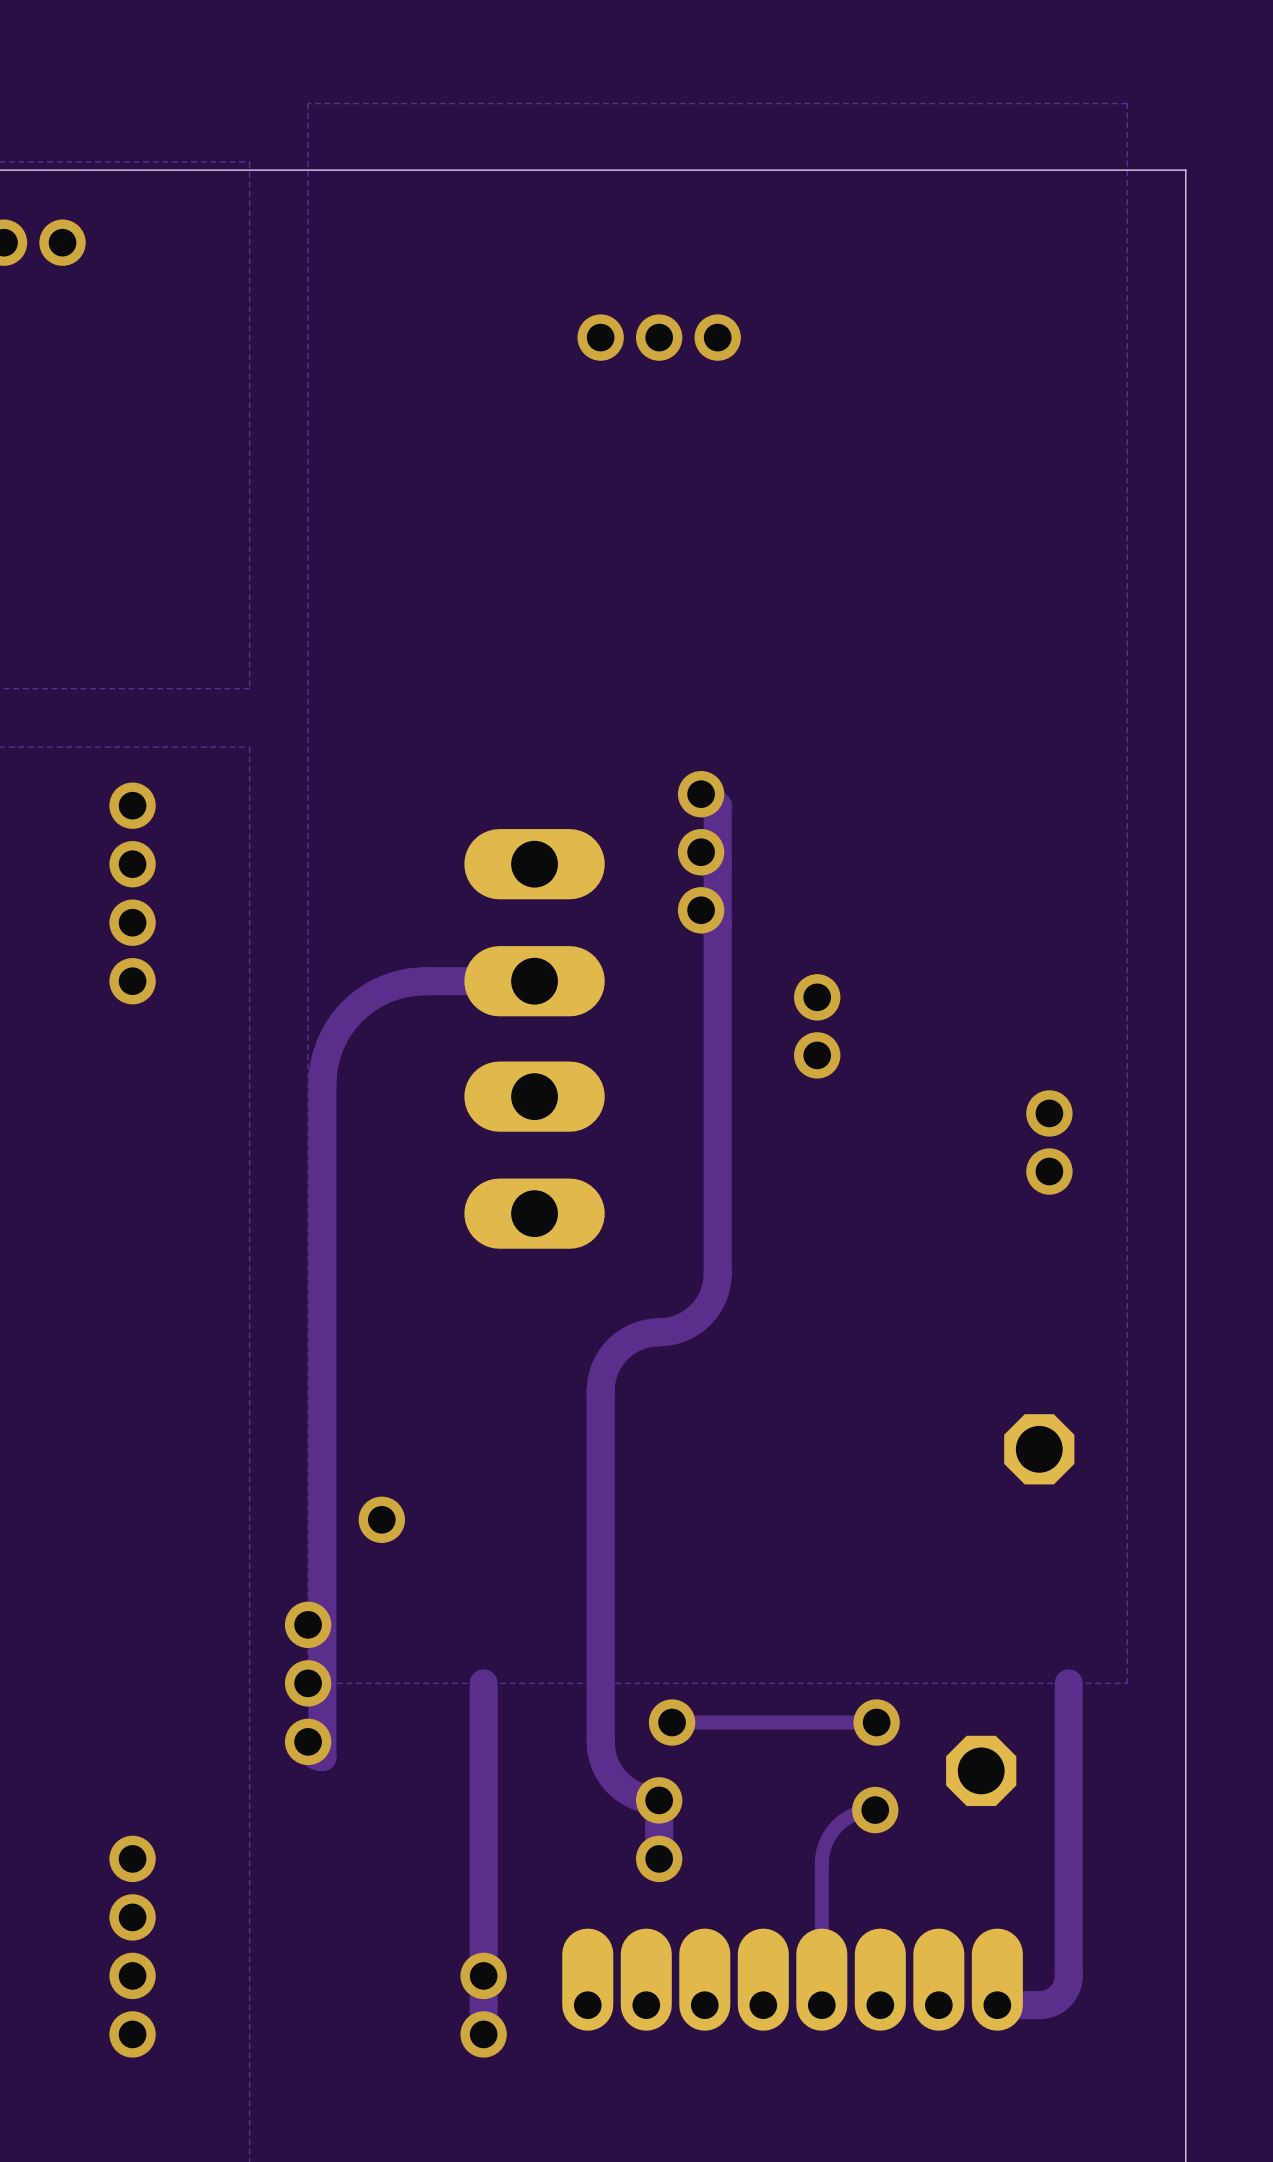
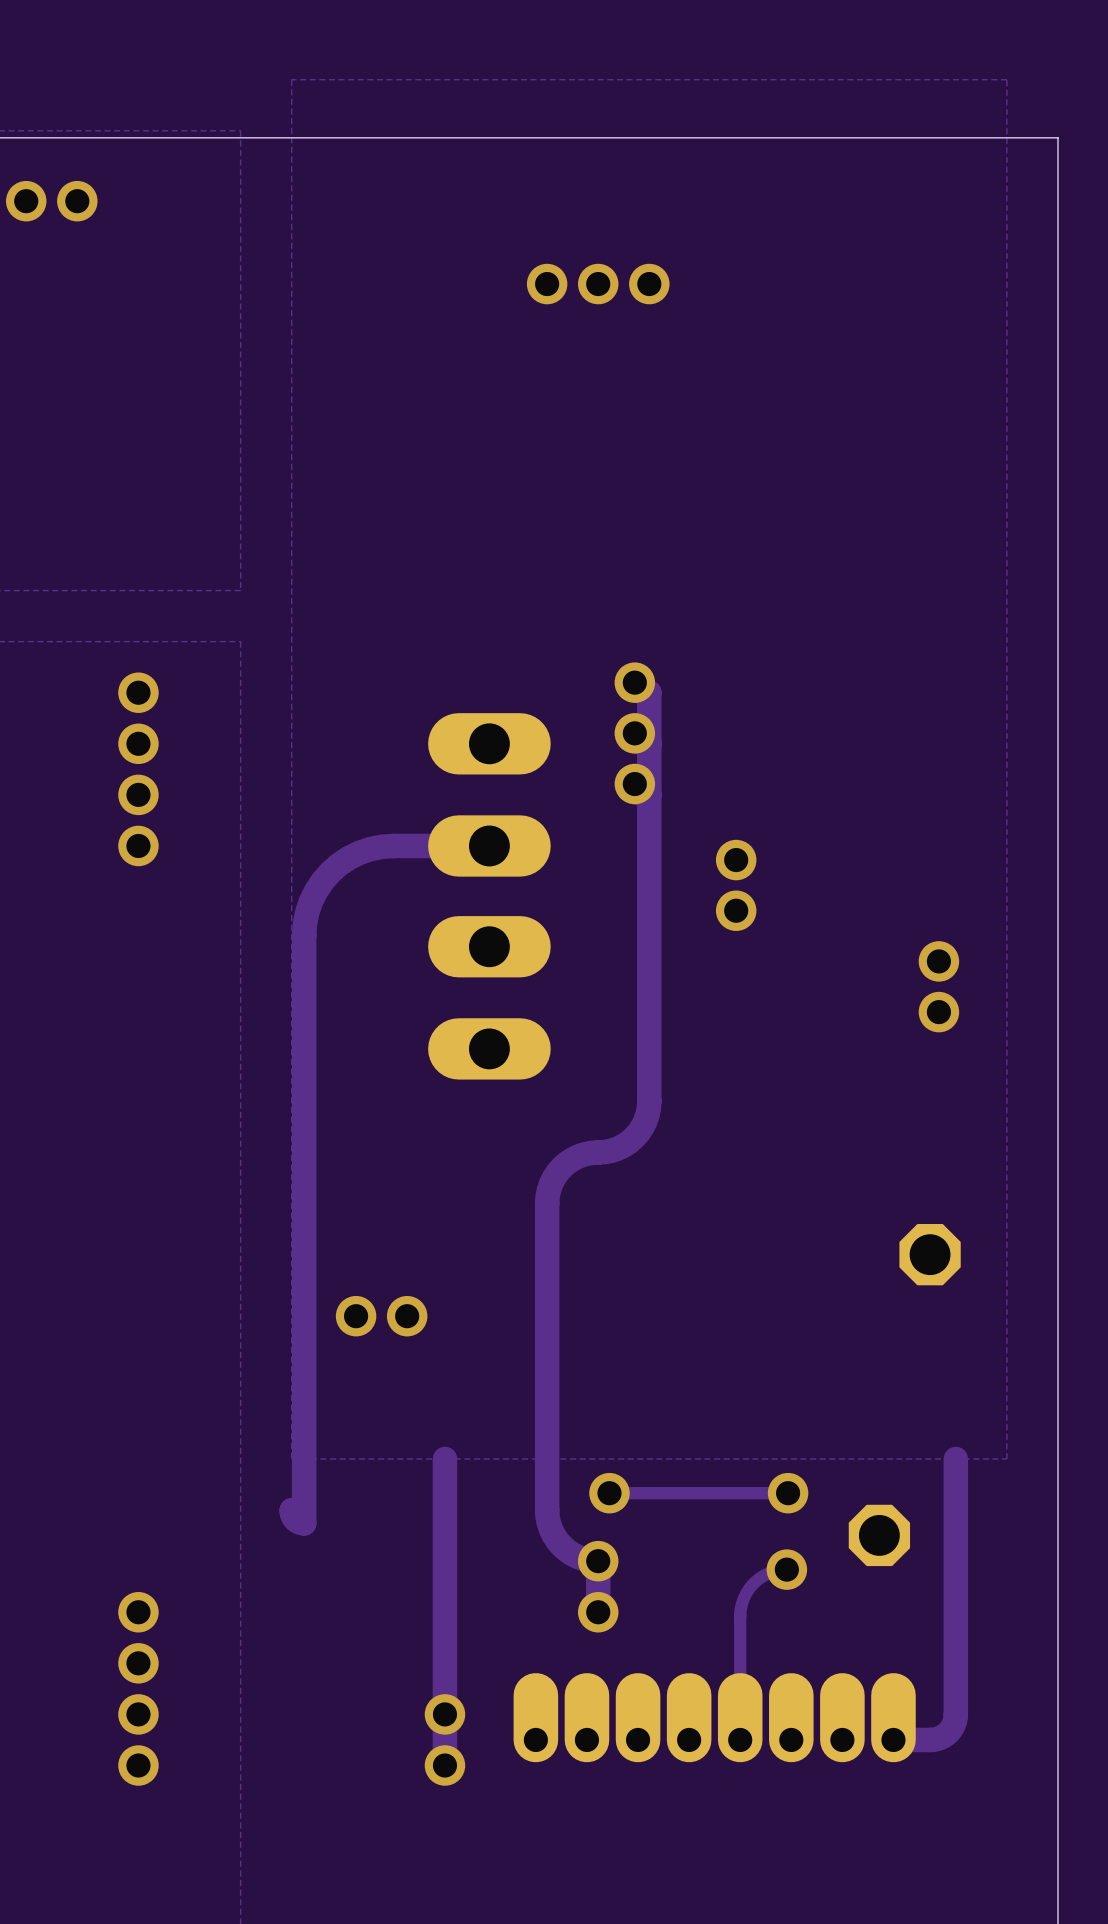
via: none -> (407, 1316)
via: (308, 1624) -> none
via: (308, 1683) -> none
via: (308, 1741) -> none

